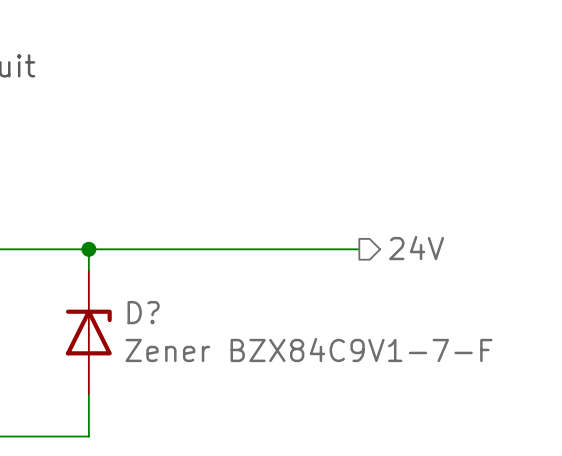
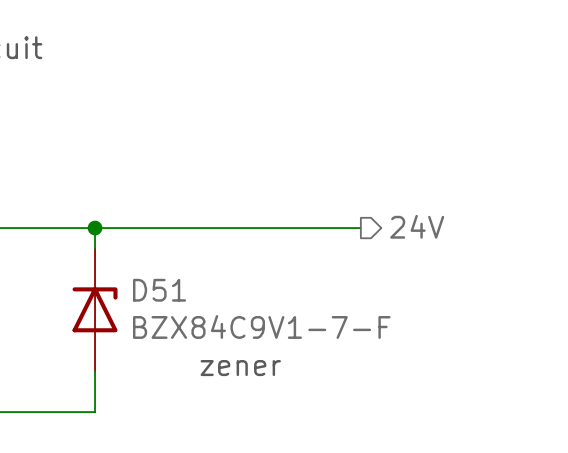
D? name: D? (143, 312) -> D51 (159, 290)
D? value: Zener BZX84C9V1-7-F (309, 349) -> BZX84C9V1-7-F (261, 326)
text: none -> zener (240, 368)

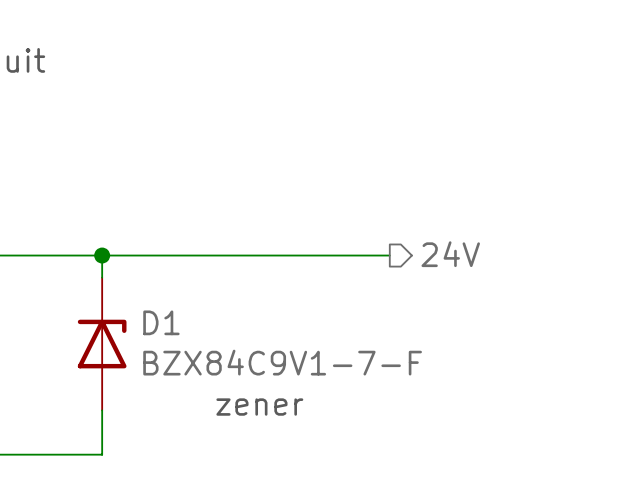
D51 name: D51 (159, 290) -> D1 (161, 322)

